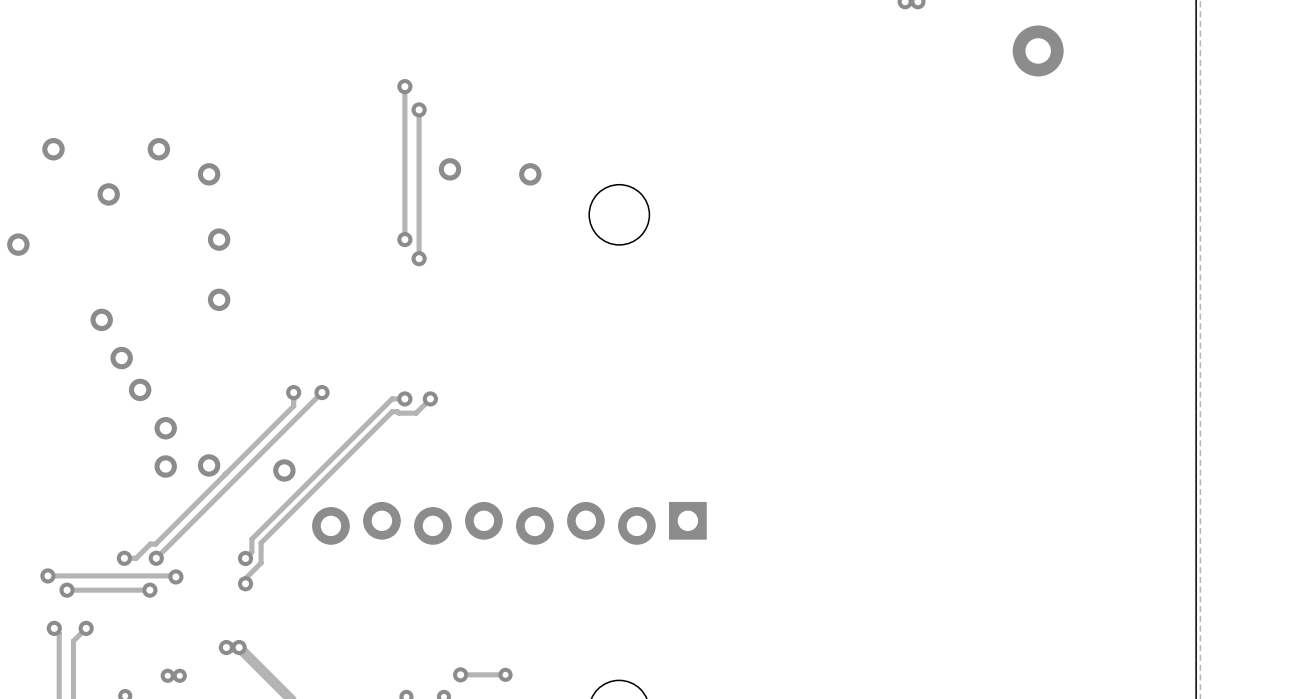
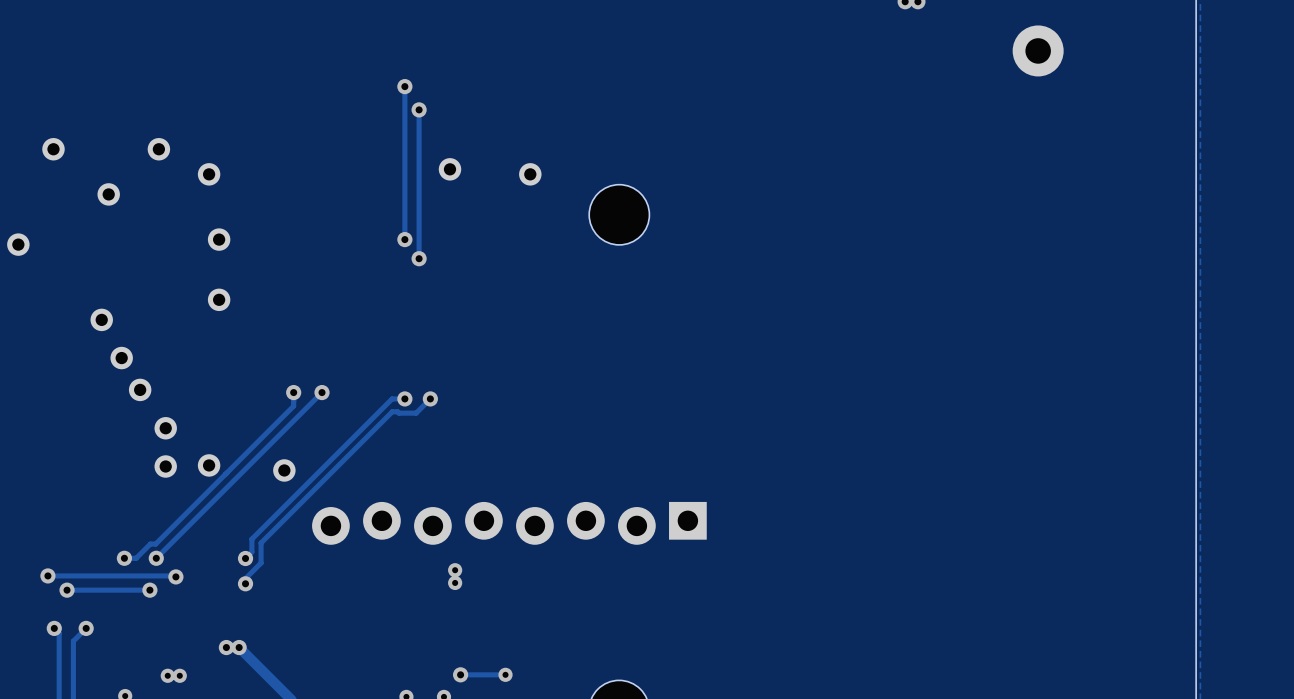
via: none -> (455, 570)
via: none -> (455, 582)

